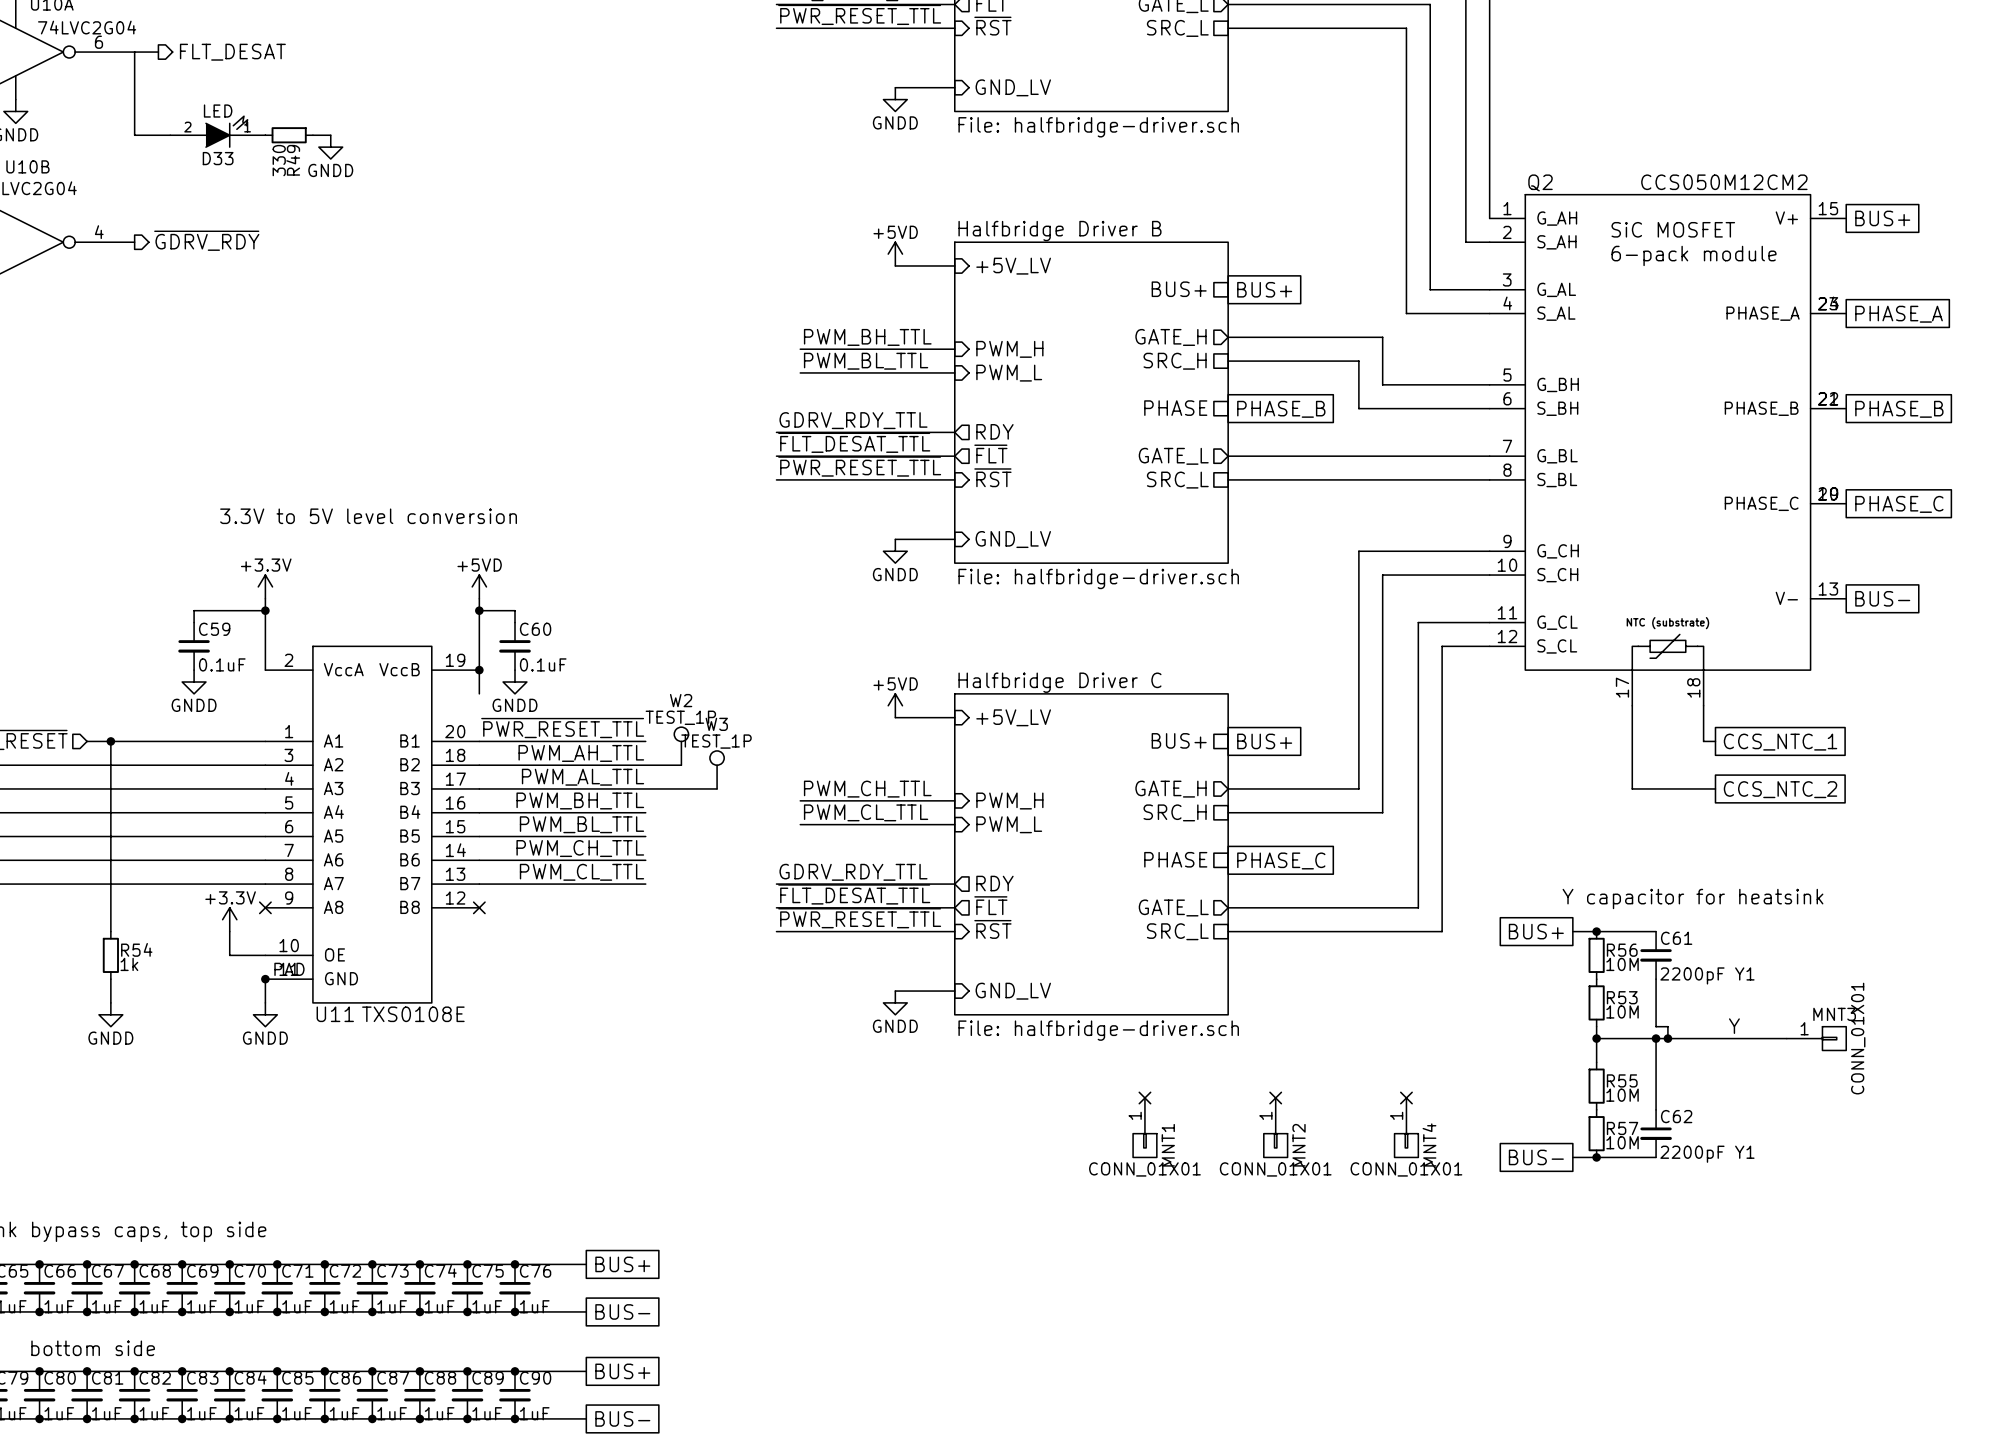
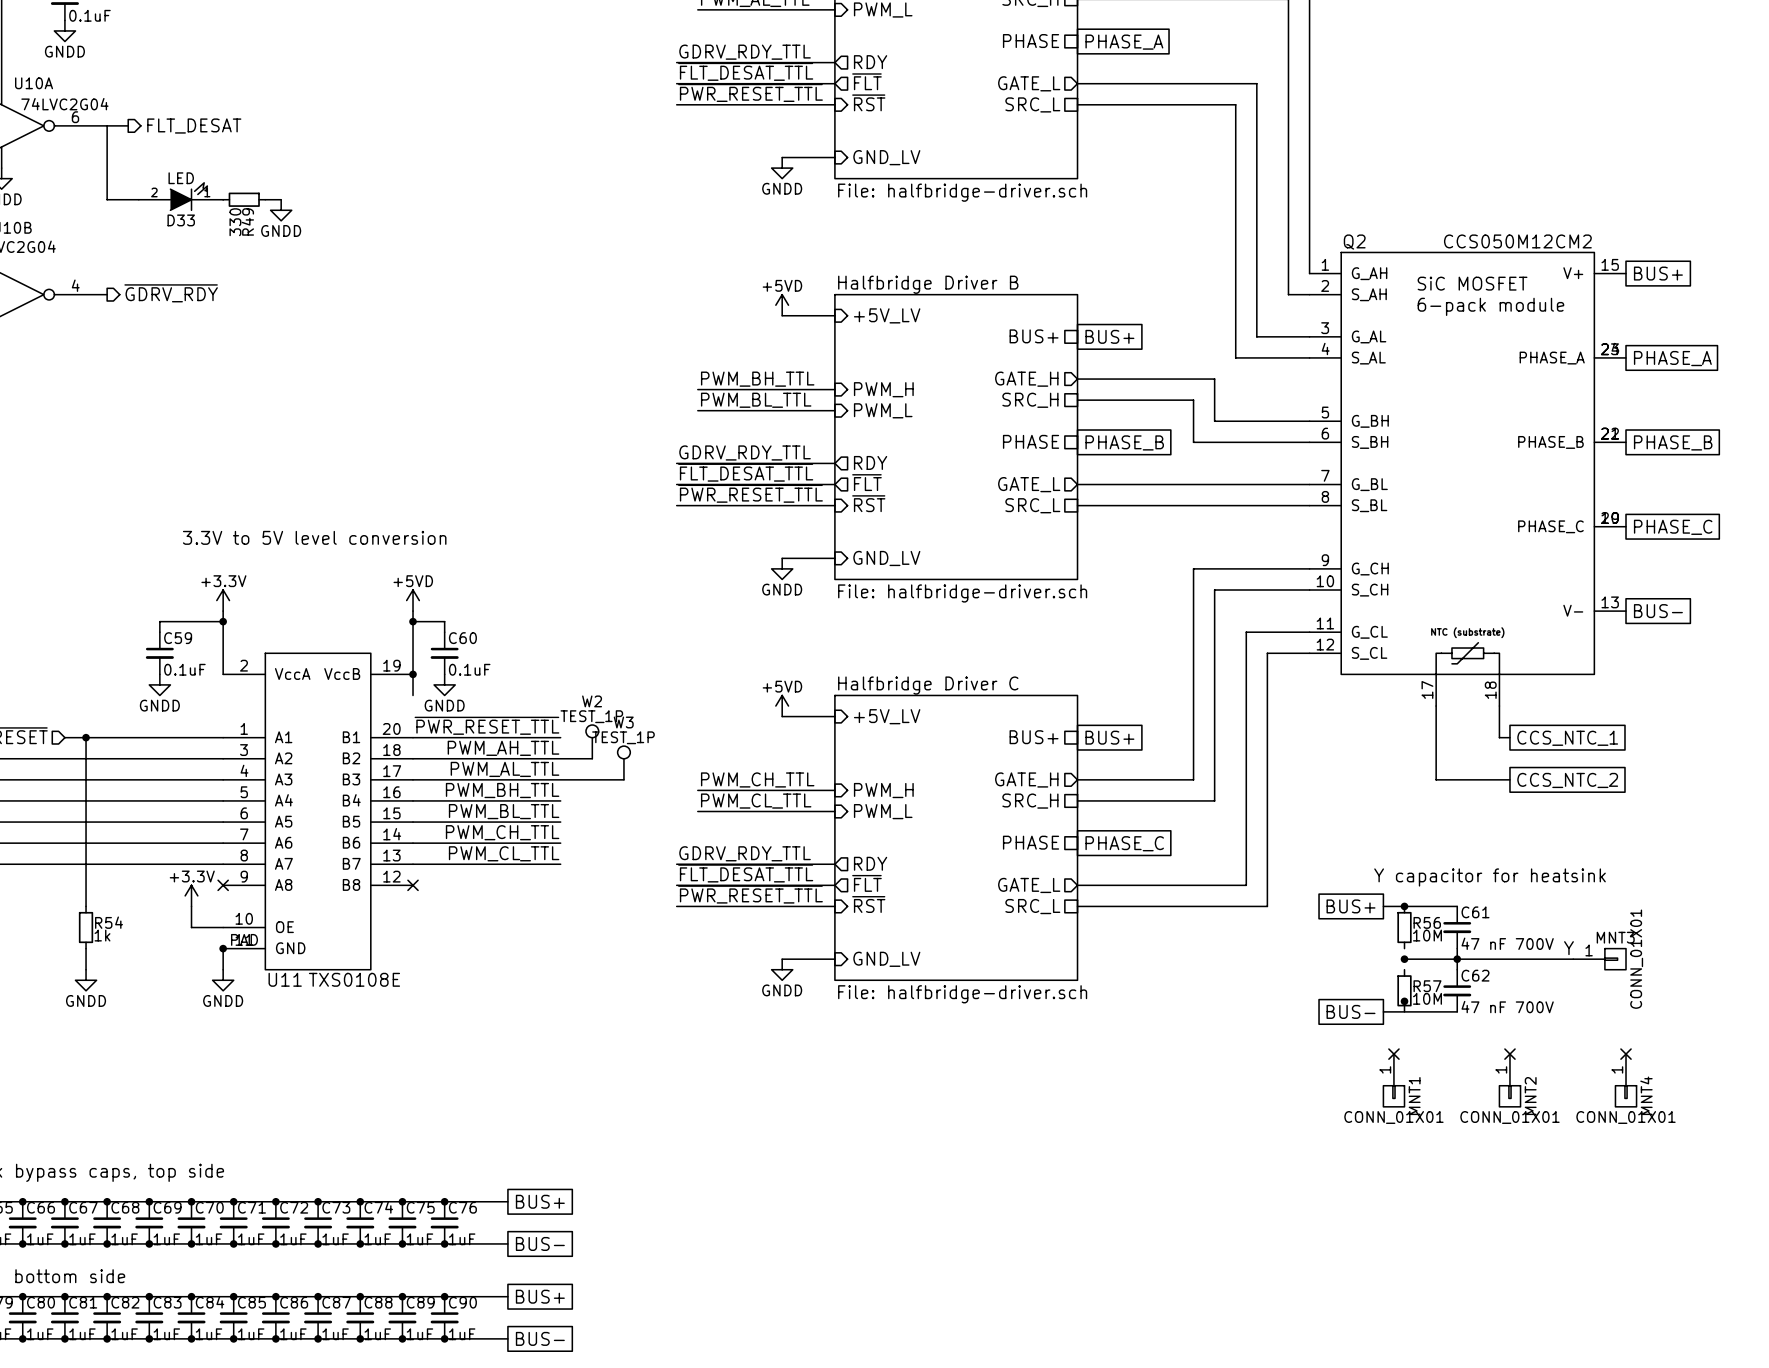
C61 value: 2200pF Y1 (1707, 975) -> 47 nF 700V (1507, 943)
junction: none -> (1404, 959)
junction: none -> (1457, 959)
R53: 10M (1596, 1002) -> none
wire: (1656, 1002) (1656, 1026) (1667, 1026) (1667, 1038) -> none
wire: (1596, 1026) (1596, 1062) -> none
label position: Y (1734, 1026) -> Y (1568, 948)
wire: (1596, 1038) (1786, 1038) -> (1404, 959) (1573, 959)
wire: (1656, 1038) (1656, 1109) -> none
junction: (1656, 1038) -> none
junction: (1667, 1038) -> none
MNT3 position: (1816, 1038) -> (1599, 959)
R55: 10M (1596, 1086) -> none
no-connect mark: (1144, 1098) -> none
no-connect mark: (1275, 1098) -> none
no-connect mark: (1406, 1098) -> none
no-connect mark: none -> (1393, 1054)
no-connect mark: none -> (1509, 1054)
no-connect mark: none -> (1626, 1054)
MNT1 position: (1144, 1127) -> (1393, 1080)
MNT2 position: (1275, 1127) -> (1509, 1080)
MNT4 position: (1406, 1127) -> (1626, 1080)
R57 position: (1596, 1133) -> (1404, 990)
C62 position: (1656, 1133) -> (1457, 990)
C62 value: 2200pF Y1 (1707, 1154) -> 47 nF 700V (1507, 1007)
global label position: BUS- (1536, 1157) -> BUS- (1351, 1011)
wire: (1572, 1157) (1656, 1157) -> (1383, 1011) (1457, 1011)
junction: (1596, 1157) -> none

